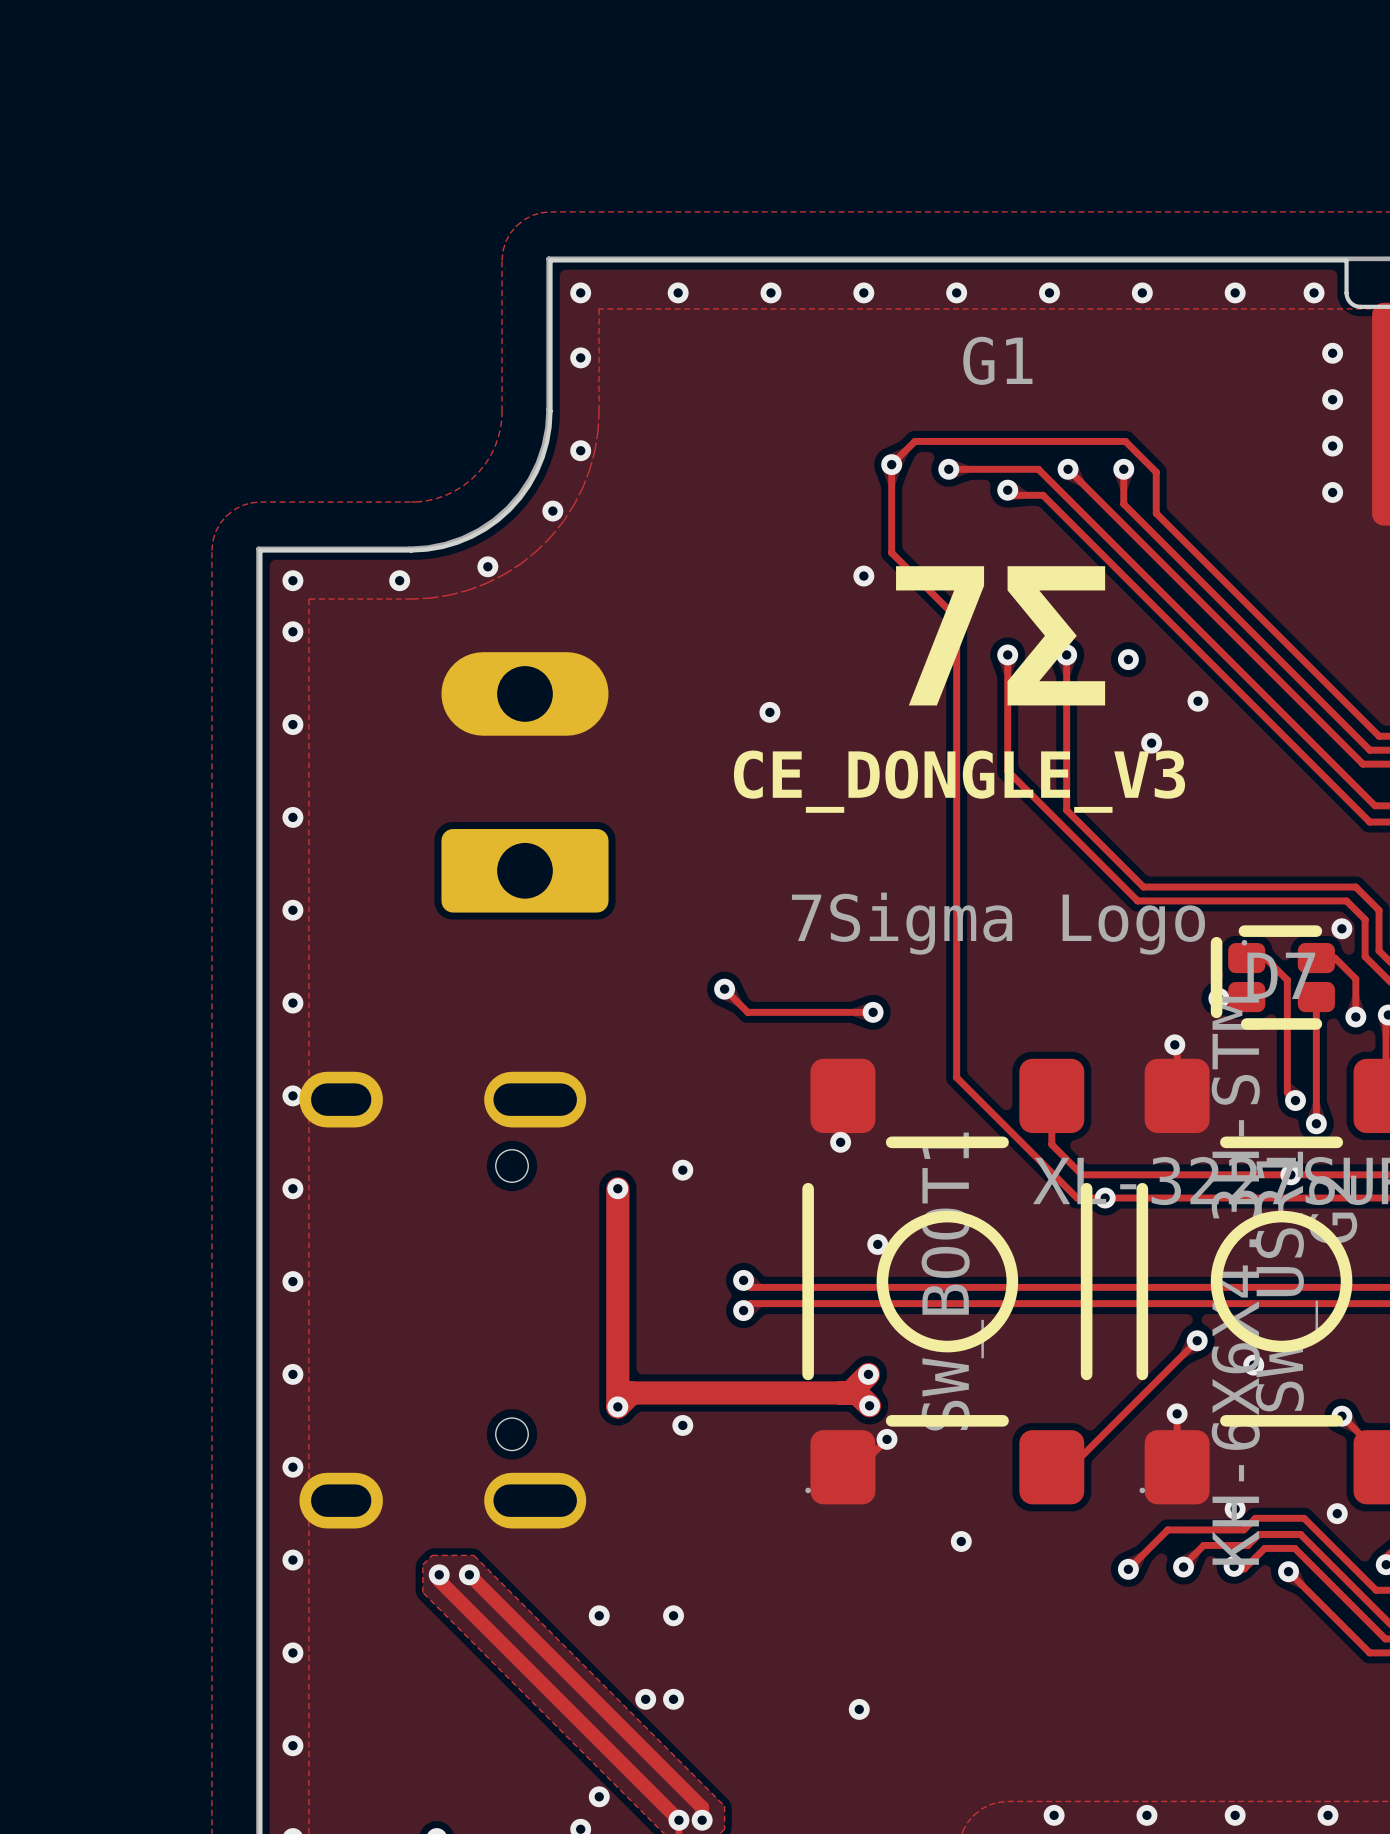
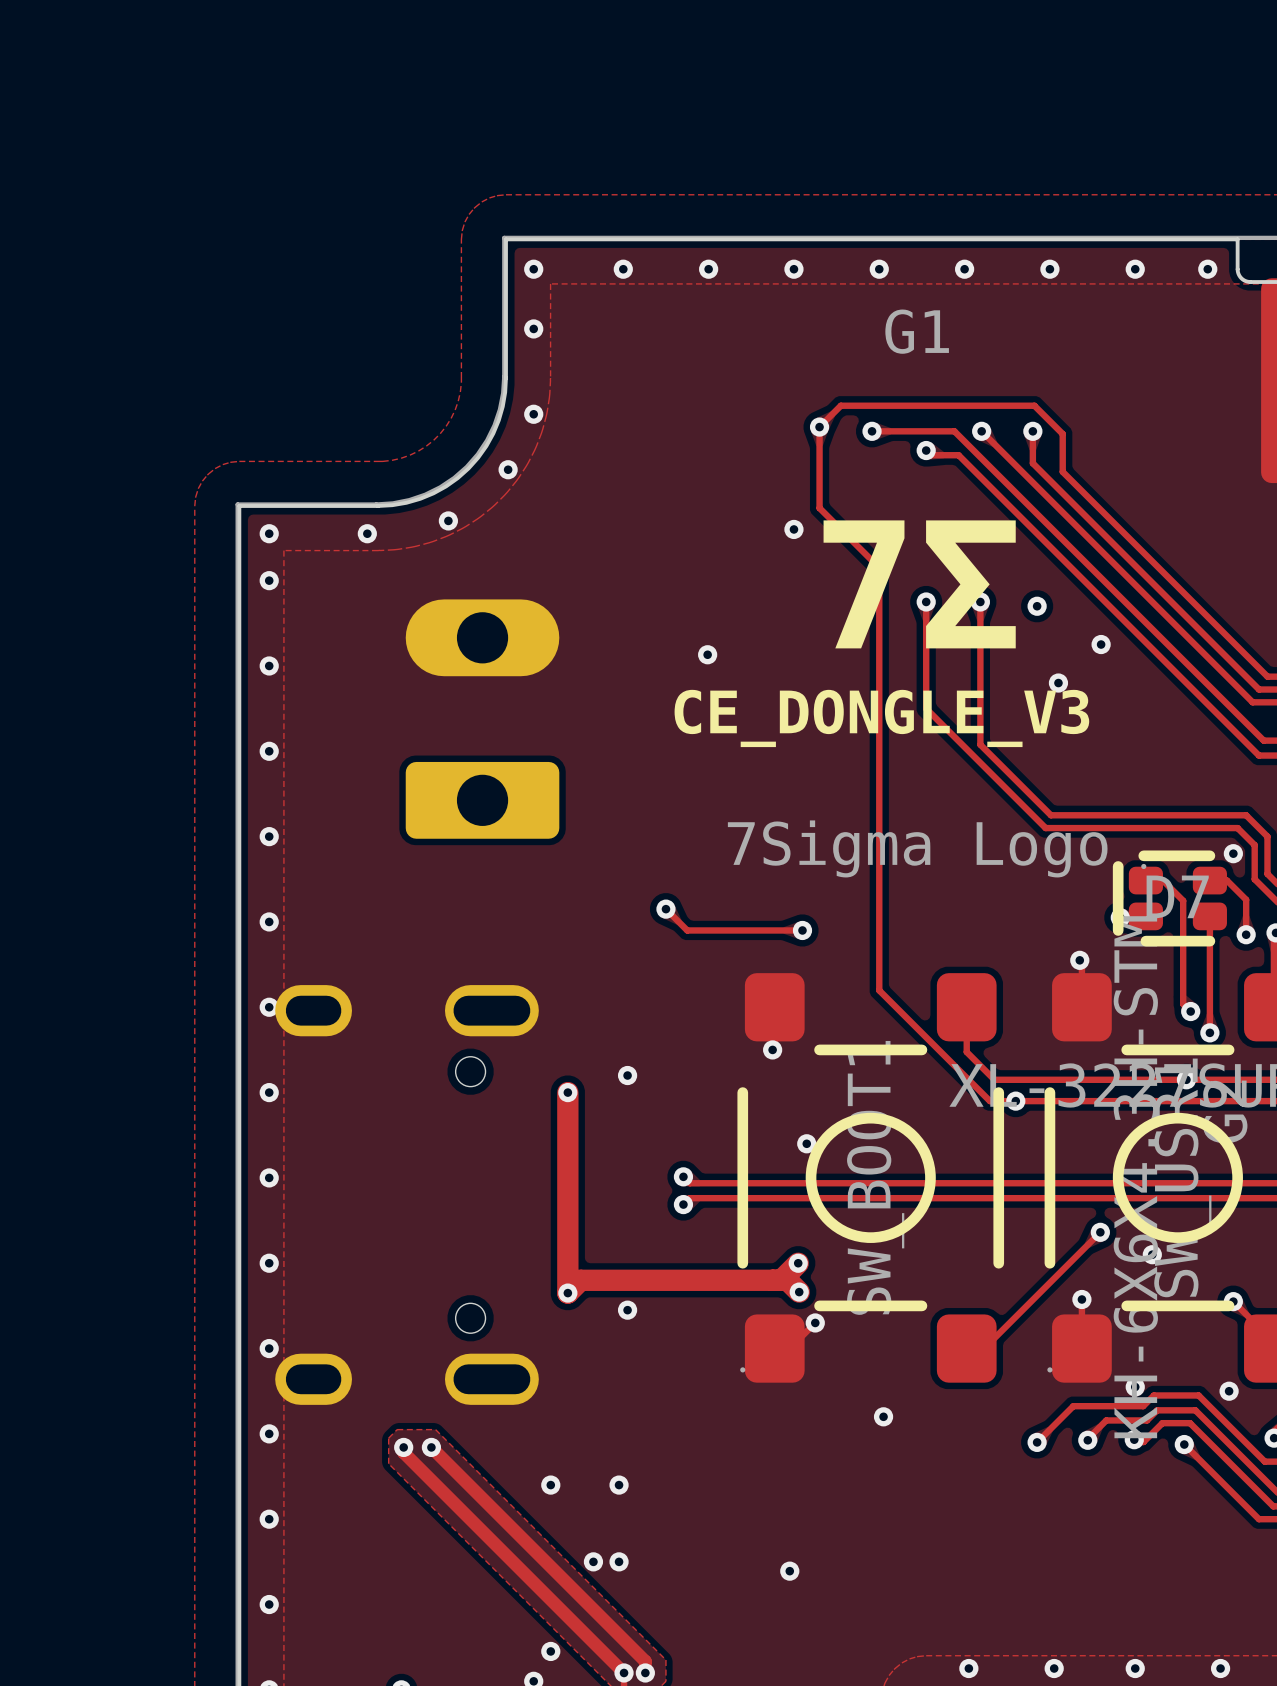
via: (1332, 353) -> none
via: (1332, 399) -> none
via: (1332, 446) -> none
via: (1332, 492) -> none

